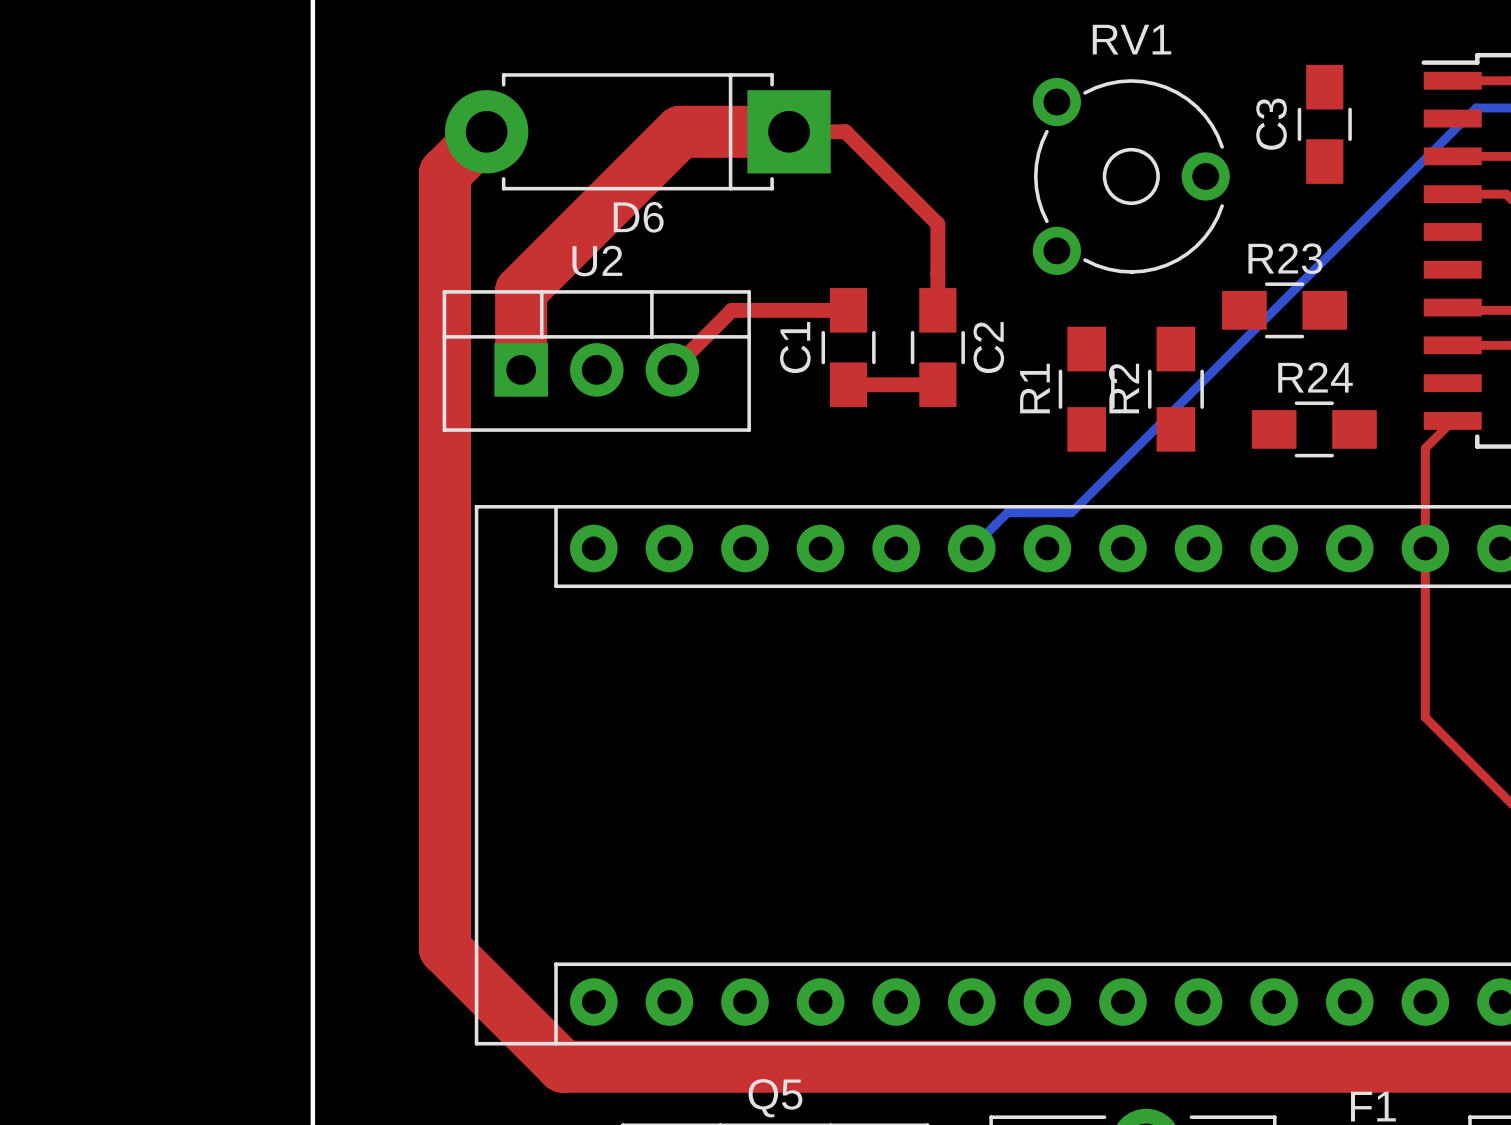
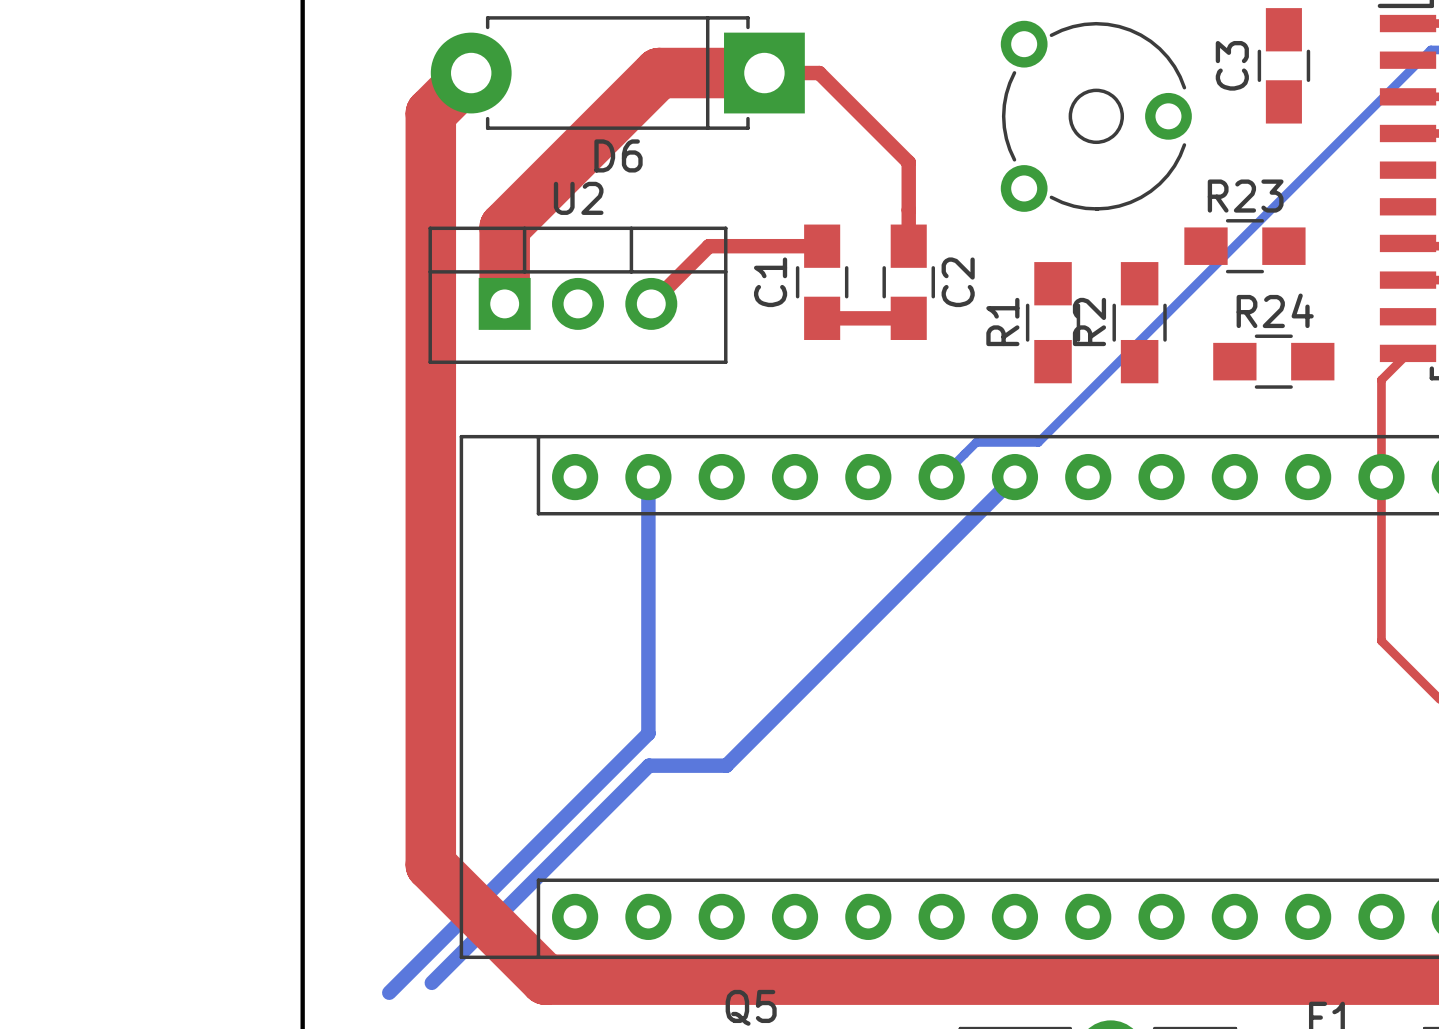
bottom track: none -> (648, 477) (648, 733) (389, 992)
bottom track: none -> (1014, 477) (726, 765) (648, 765) (431, 982)

